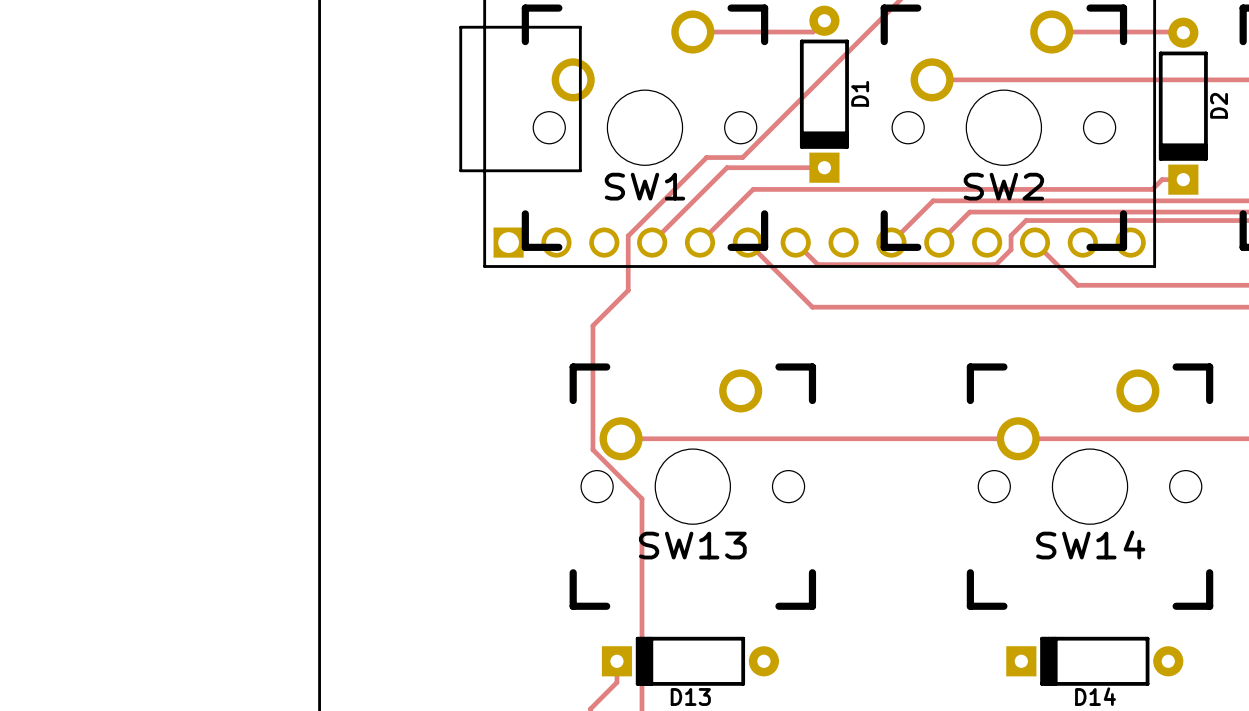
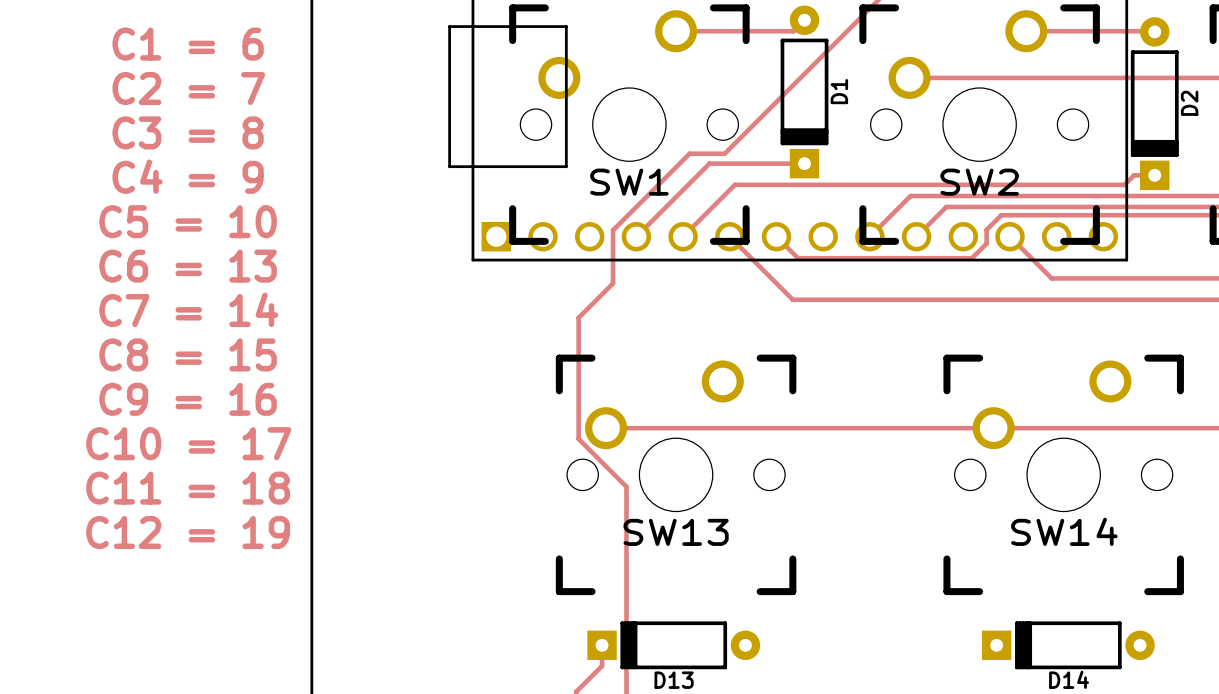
text: none -> C1 = 6 (188, 44)
text: none -> C2 = 7 (188, 88)
text: none -> C3 = 8 (188, 132)
text: none -> C4 = 9 (188, 176)
text: none -> C5 = 10 (188, 221)
text: none -> C6 = 13 (188, 266)
text: none -> C7 = 14 (188, 309)
text: none -> C8 = 15 (188, 354)
text: none -> C9 = 16 (188, 399)
text: none -> C10 = 17 (188, 443)
text: none -> C11 = 18 (188, 488)
text: none -> C12 = 19 (188, 532)

